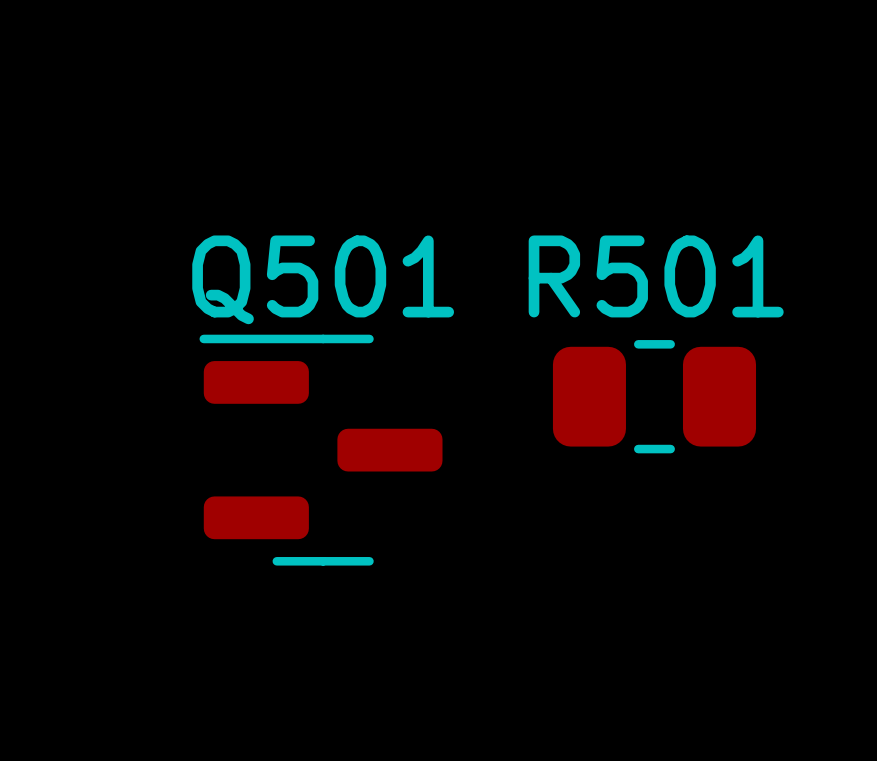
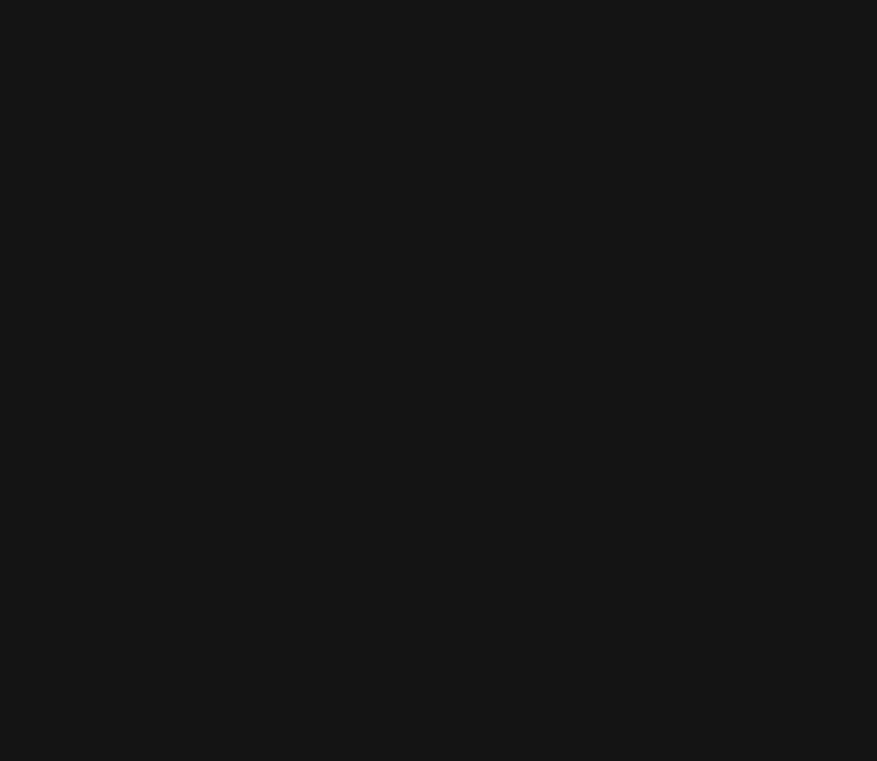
R501: (654, 396) -> none
Q501: (321, 450) -> none

